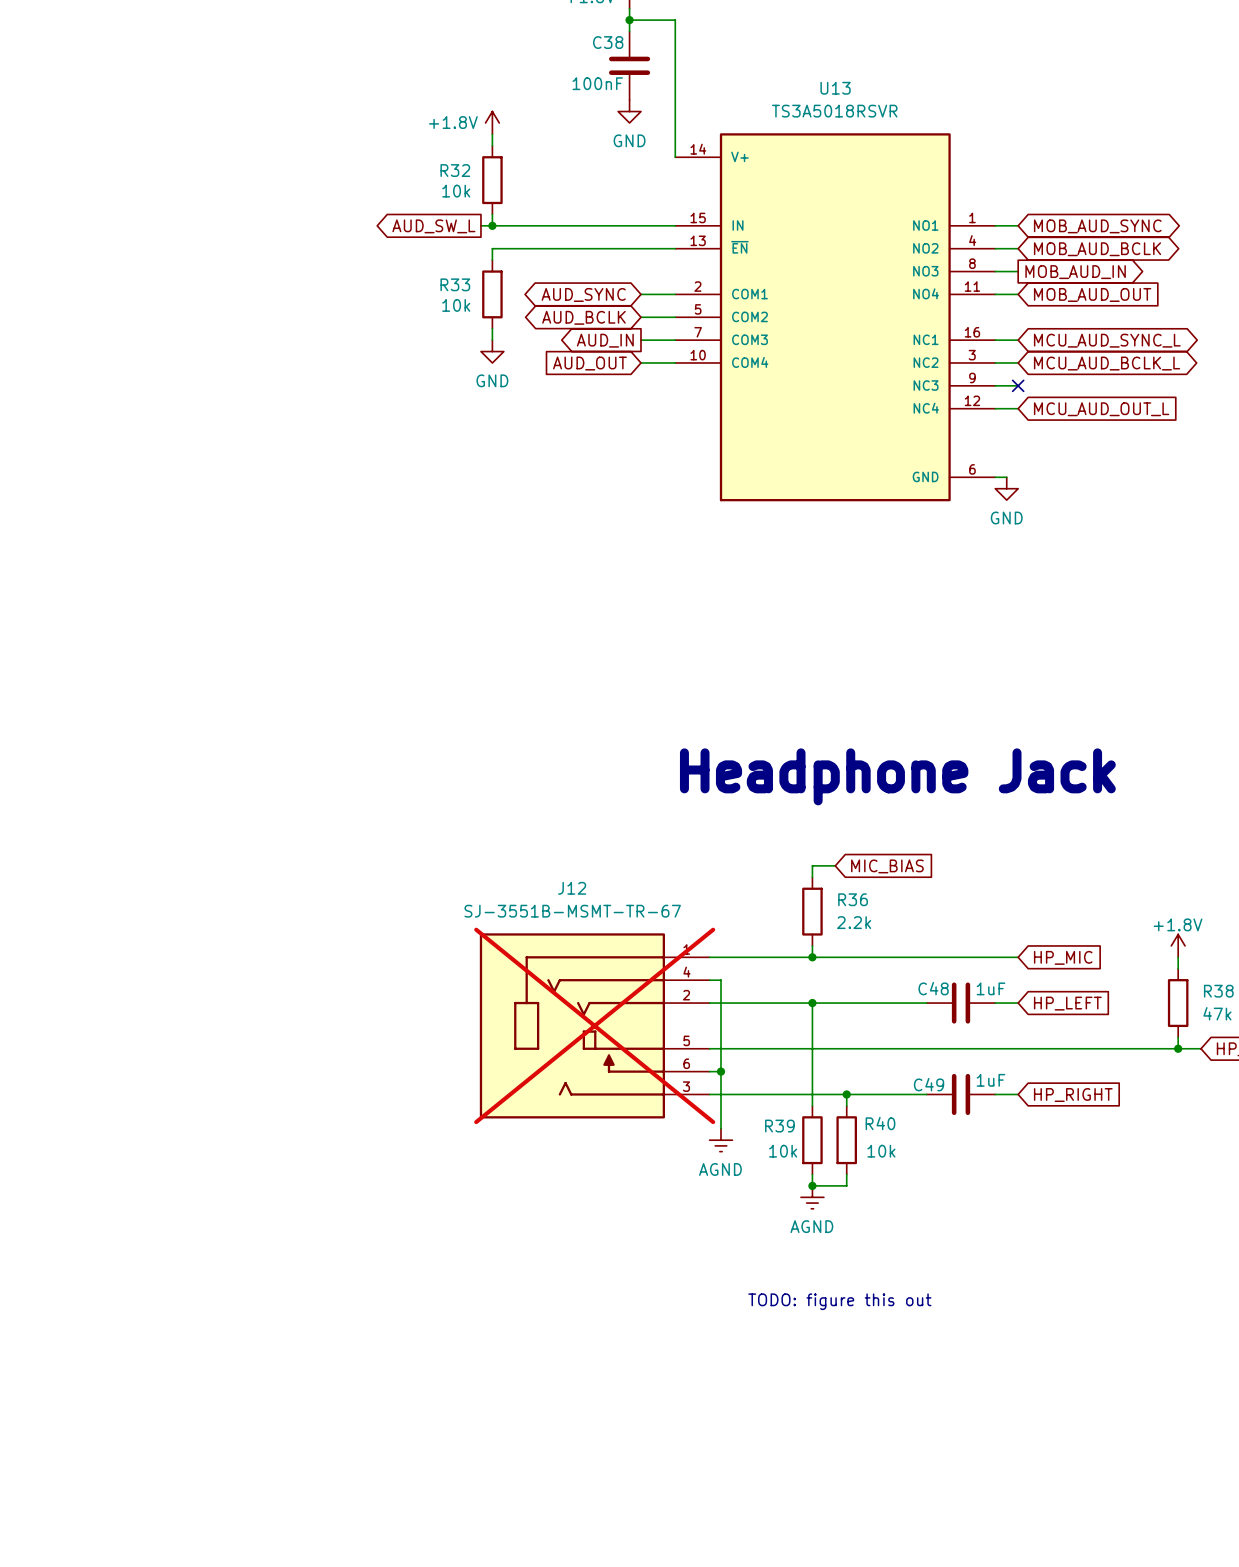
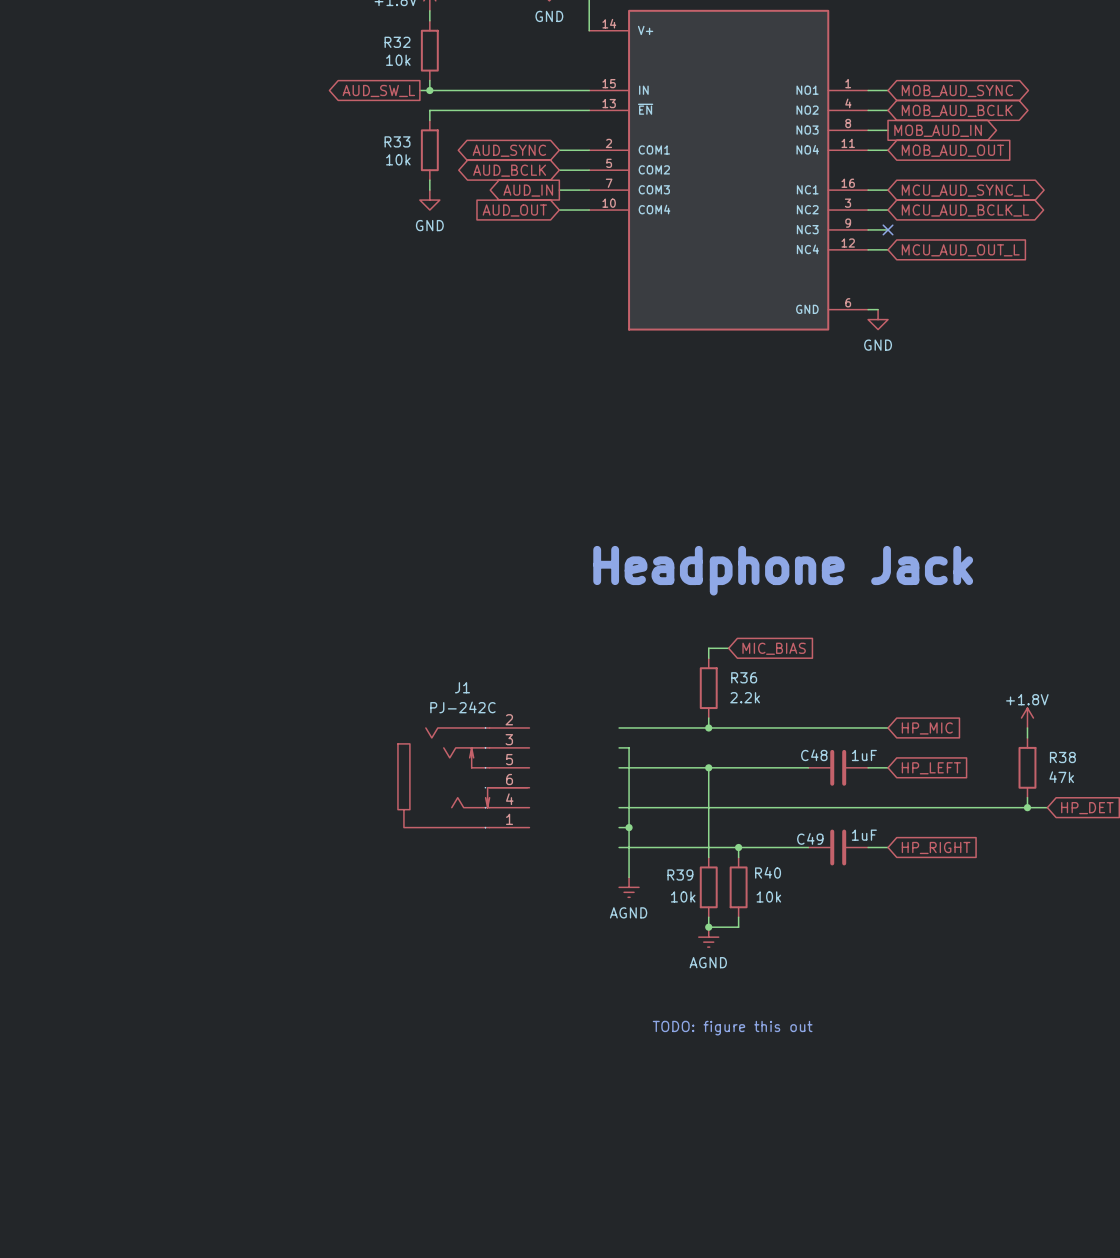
J1: none -> PJ-242C (463, 777)
J12: SJ-3551B-MSMT-TR-67 (594, 1025) -> none

